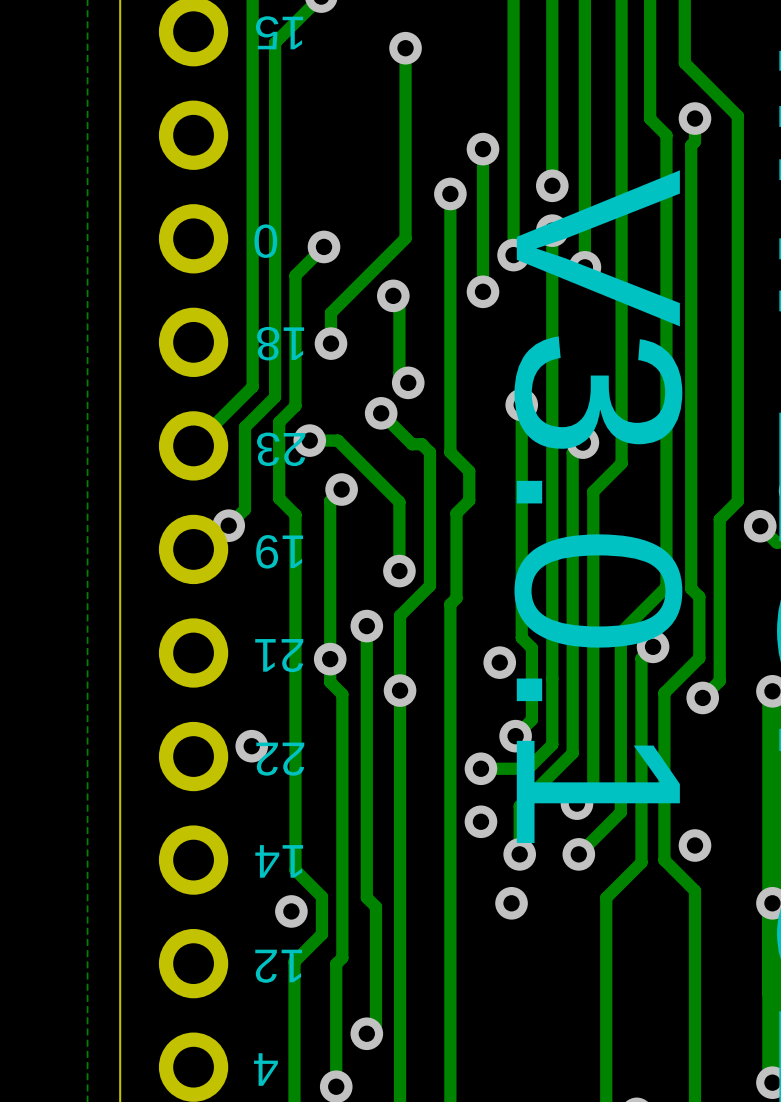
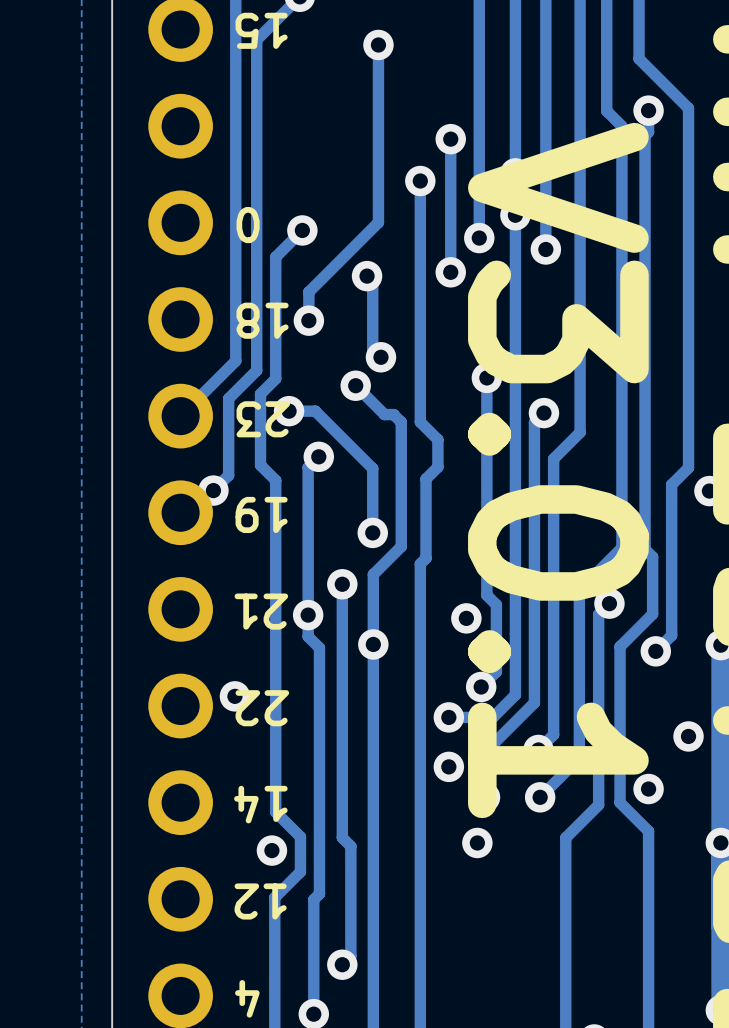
via: none -> (688, 736)

